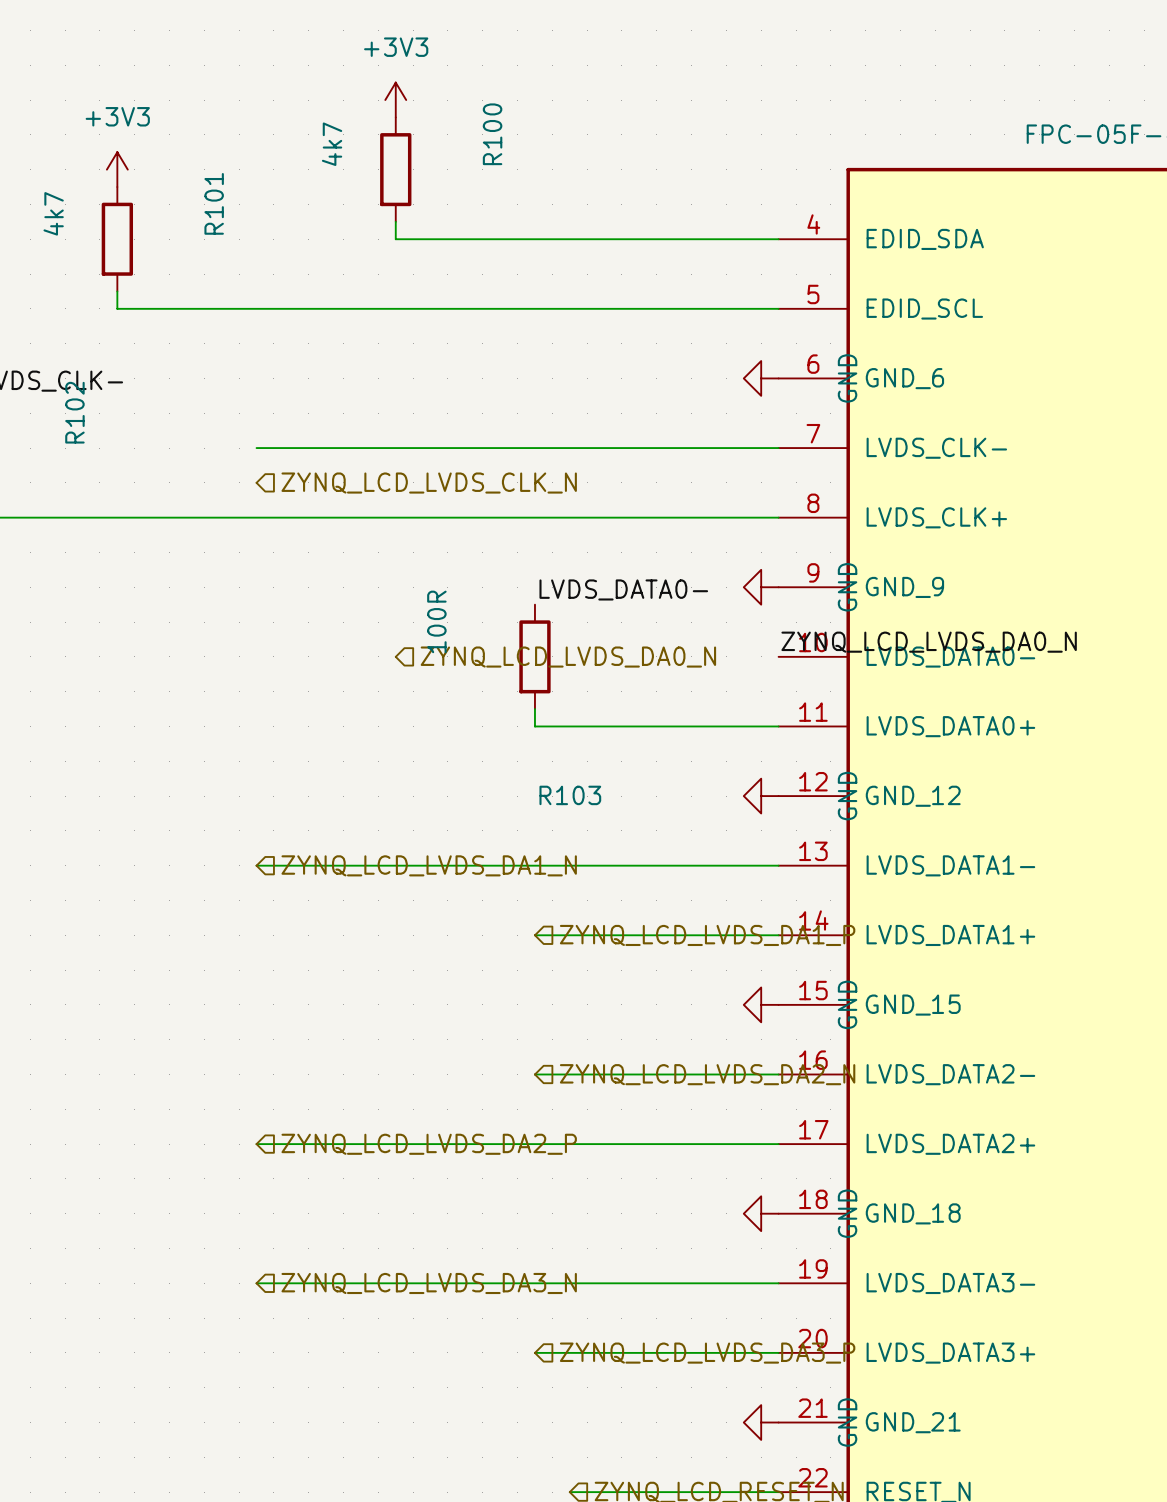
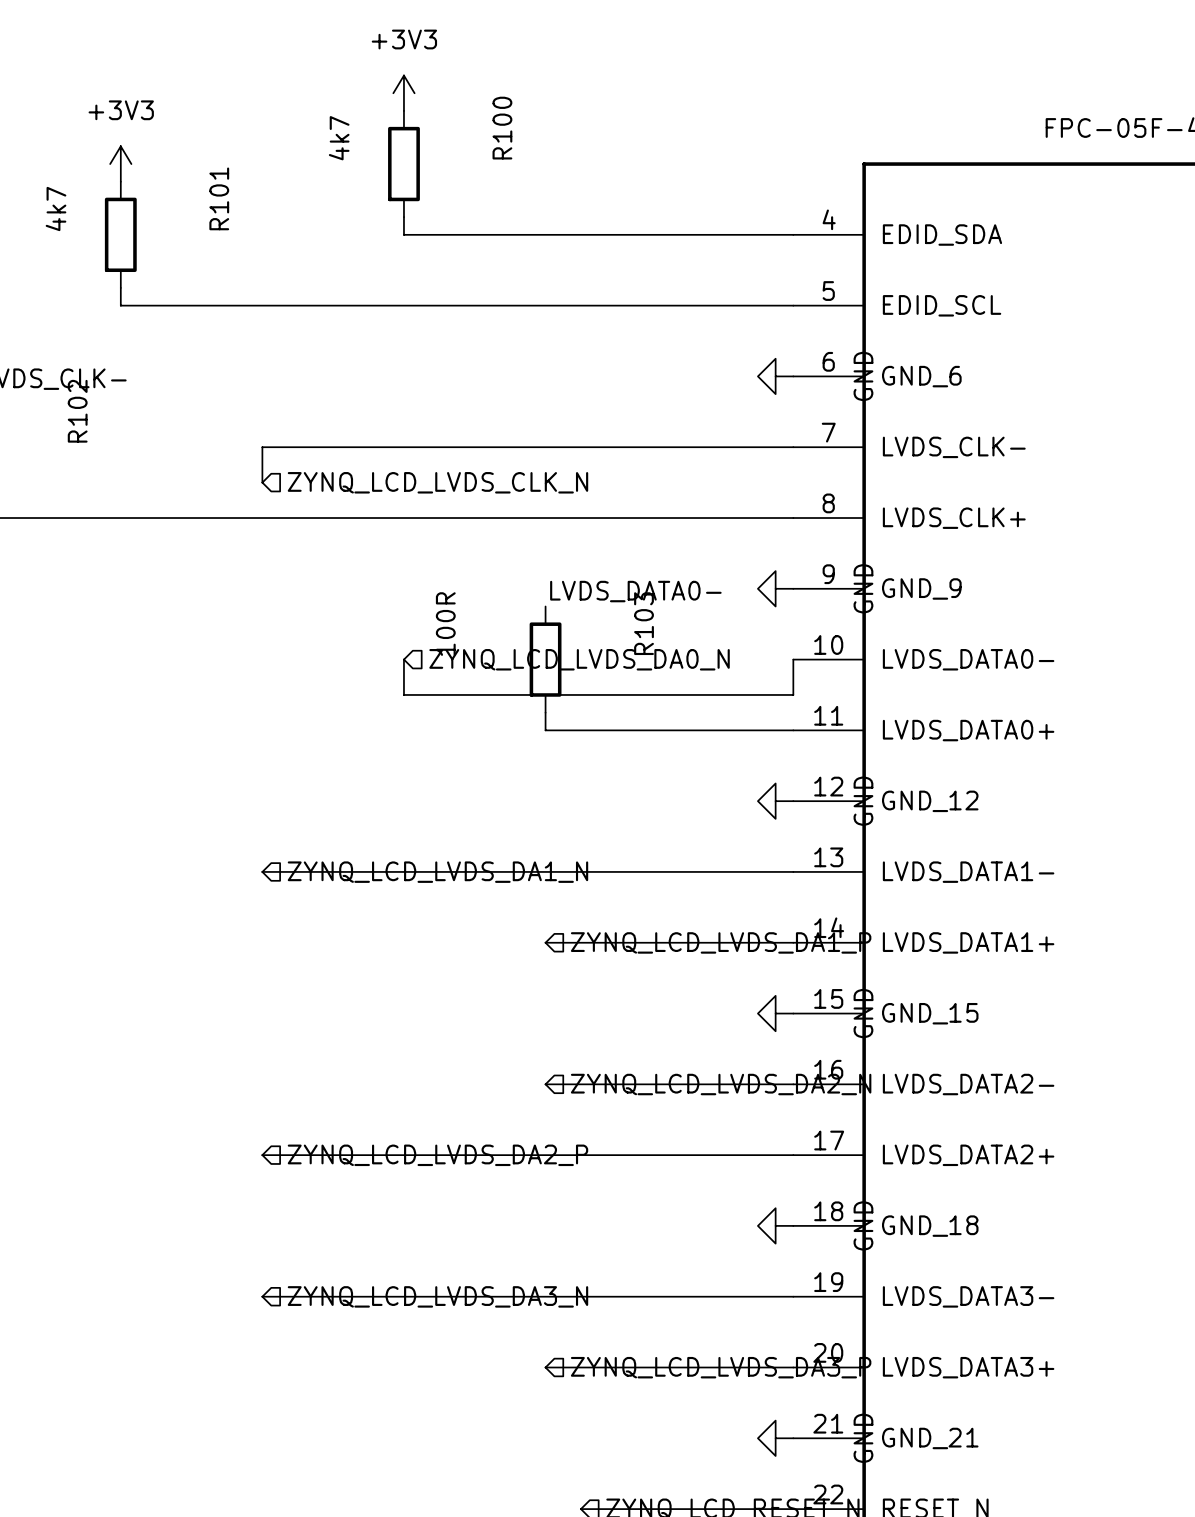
wire: none -> (262, 447) (262, 482)
label: ZYNQ_LCD_LVDS_DA0_N (929, 642) -> none
wire: none -> (403, 659) (403, 694) (793, 694) (793, 659)
R103 name rotation: 0° (570, 795) -> 90° counterclockwise (644, 623)
R103 name position: R103 (570, 795) -> R103 (644, 623)

